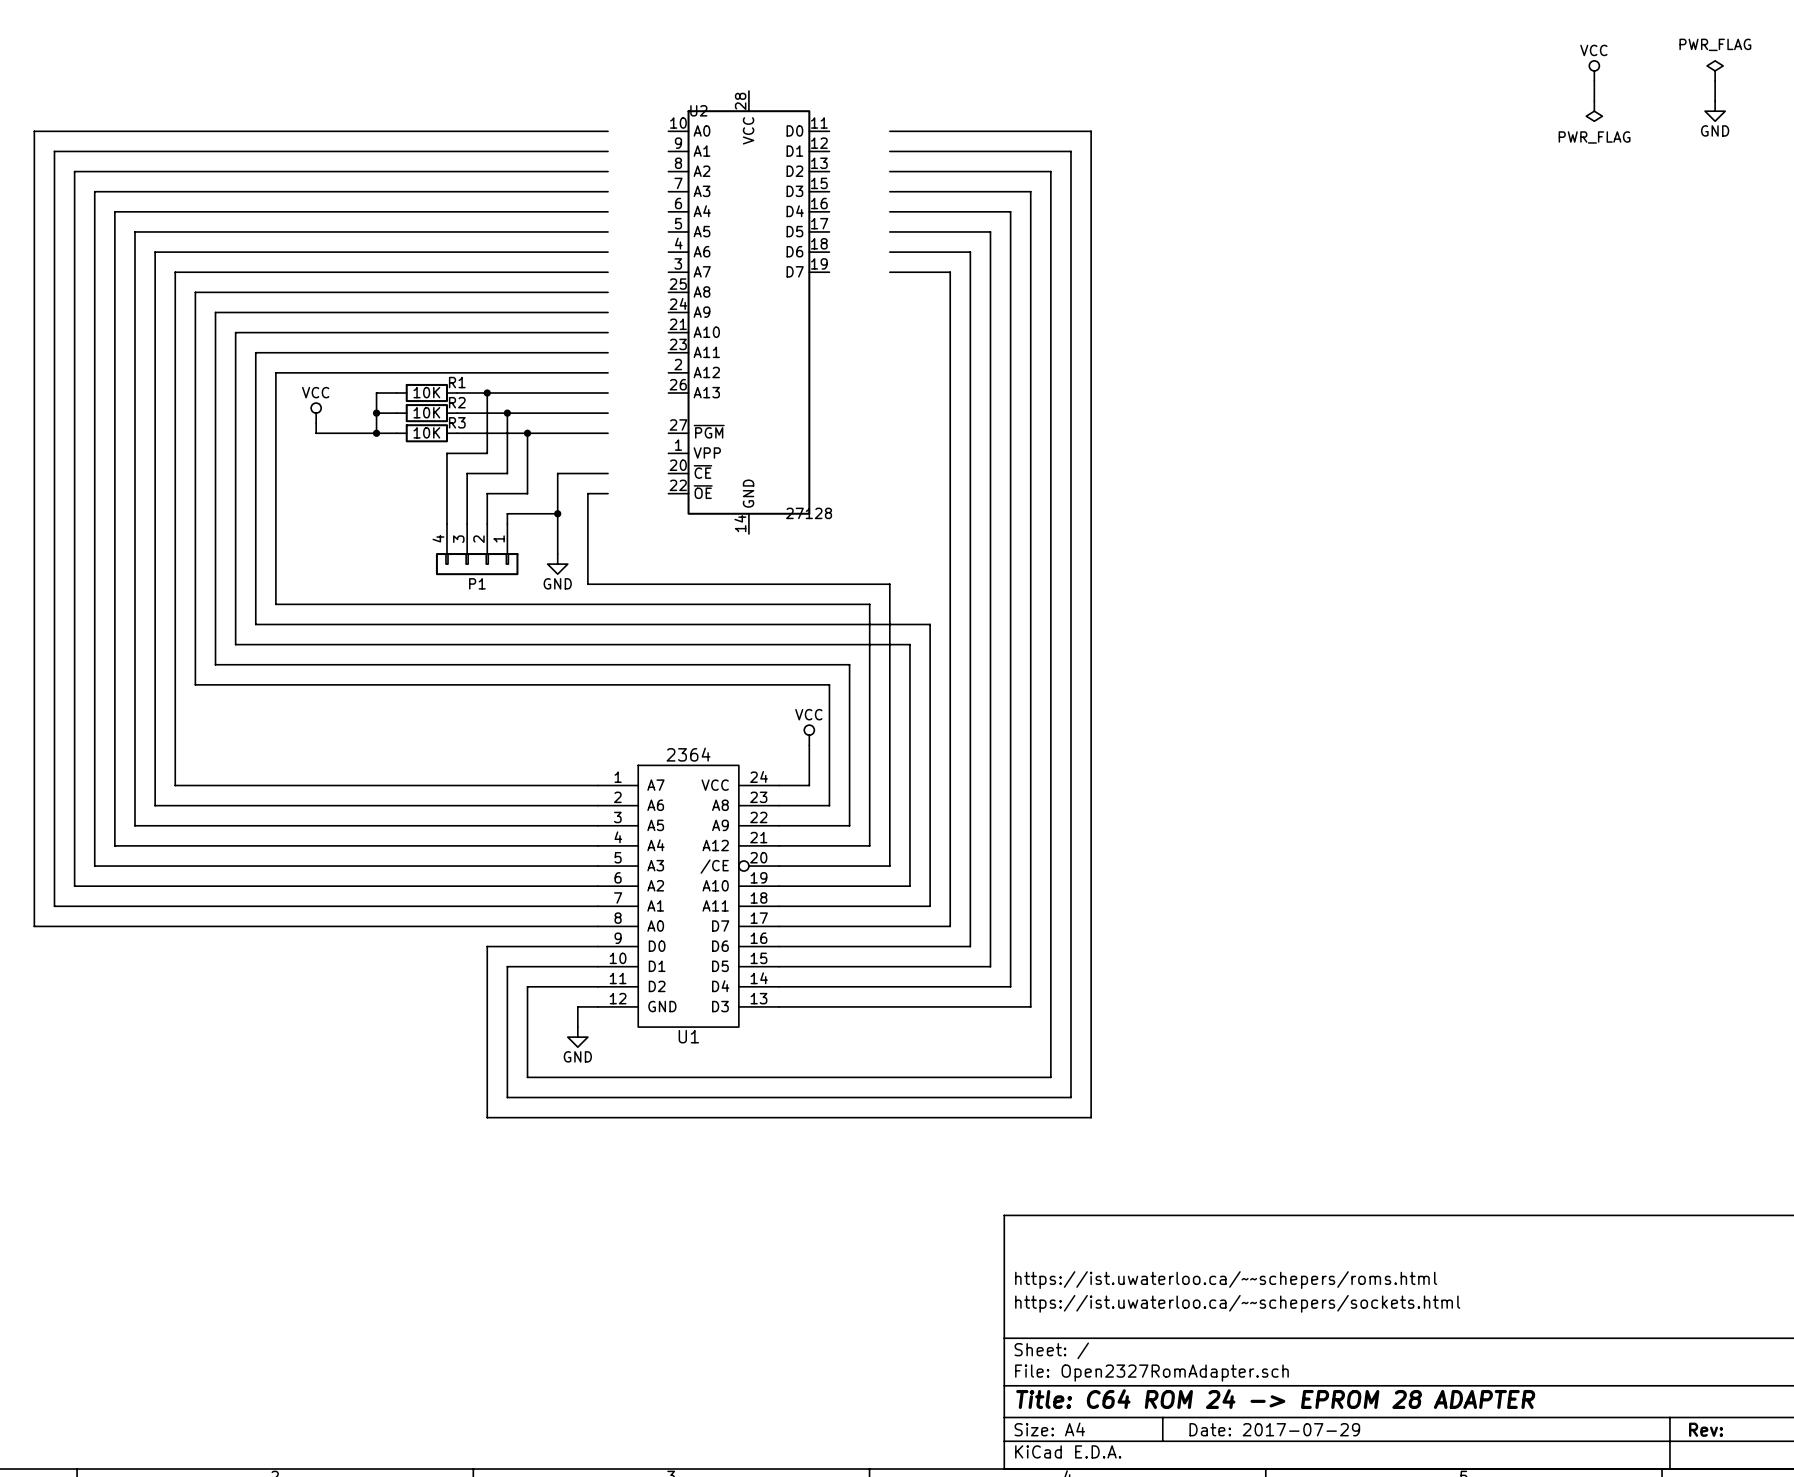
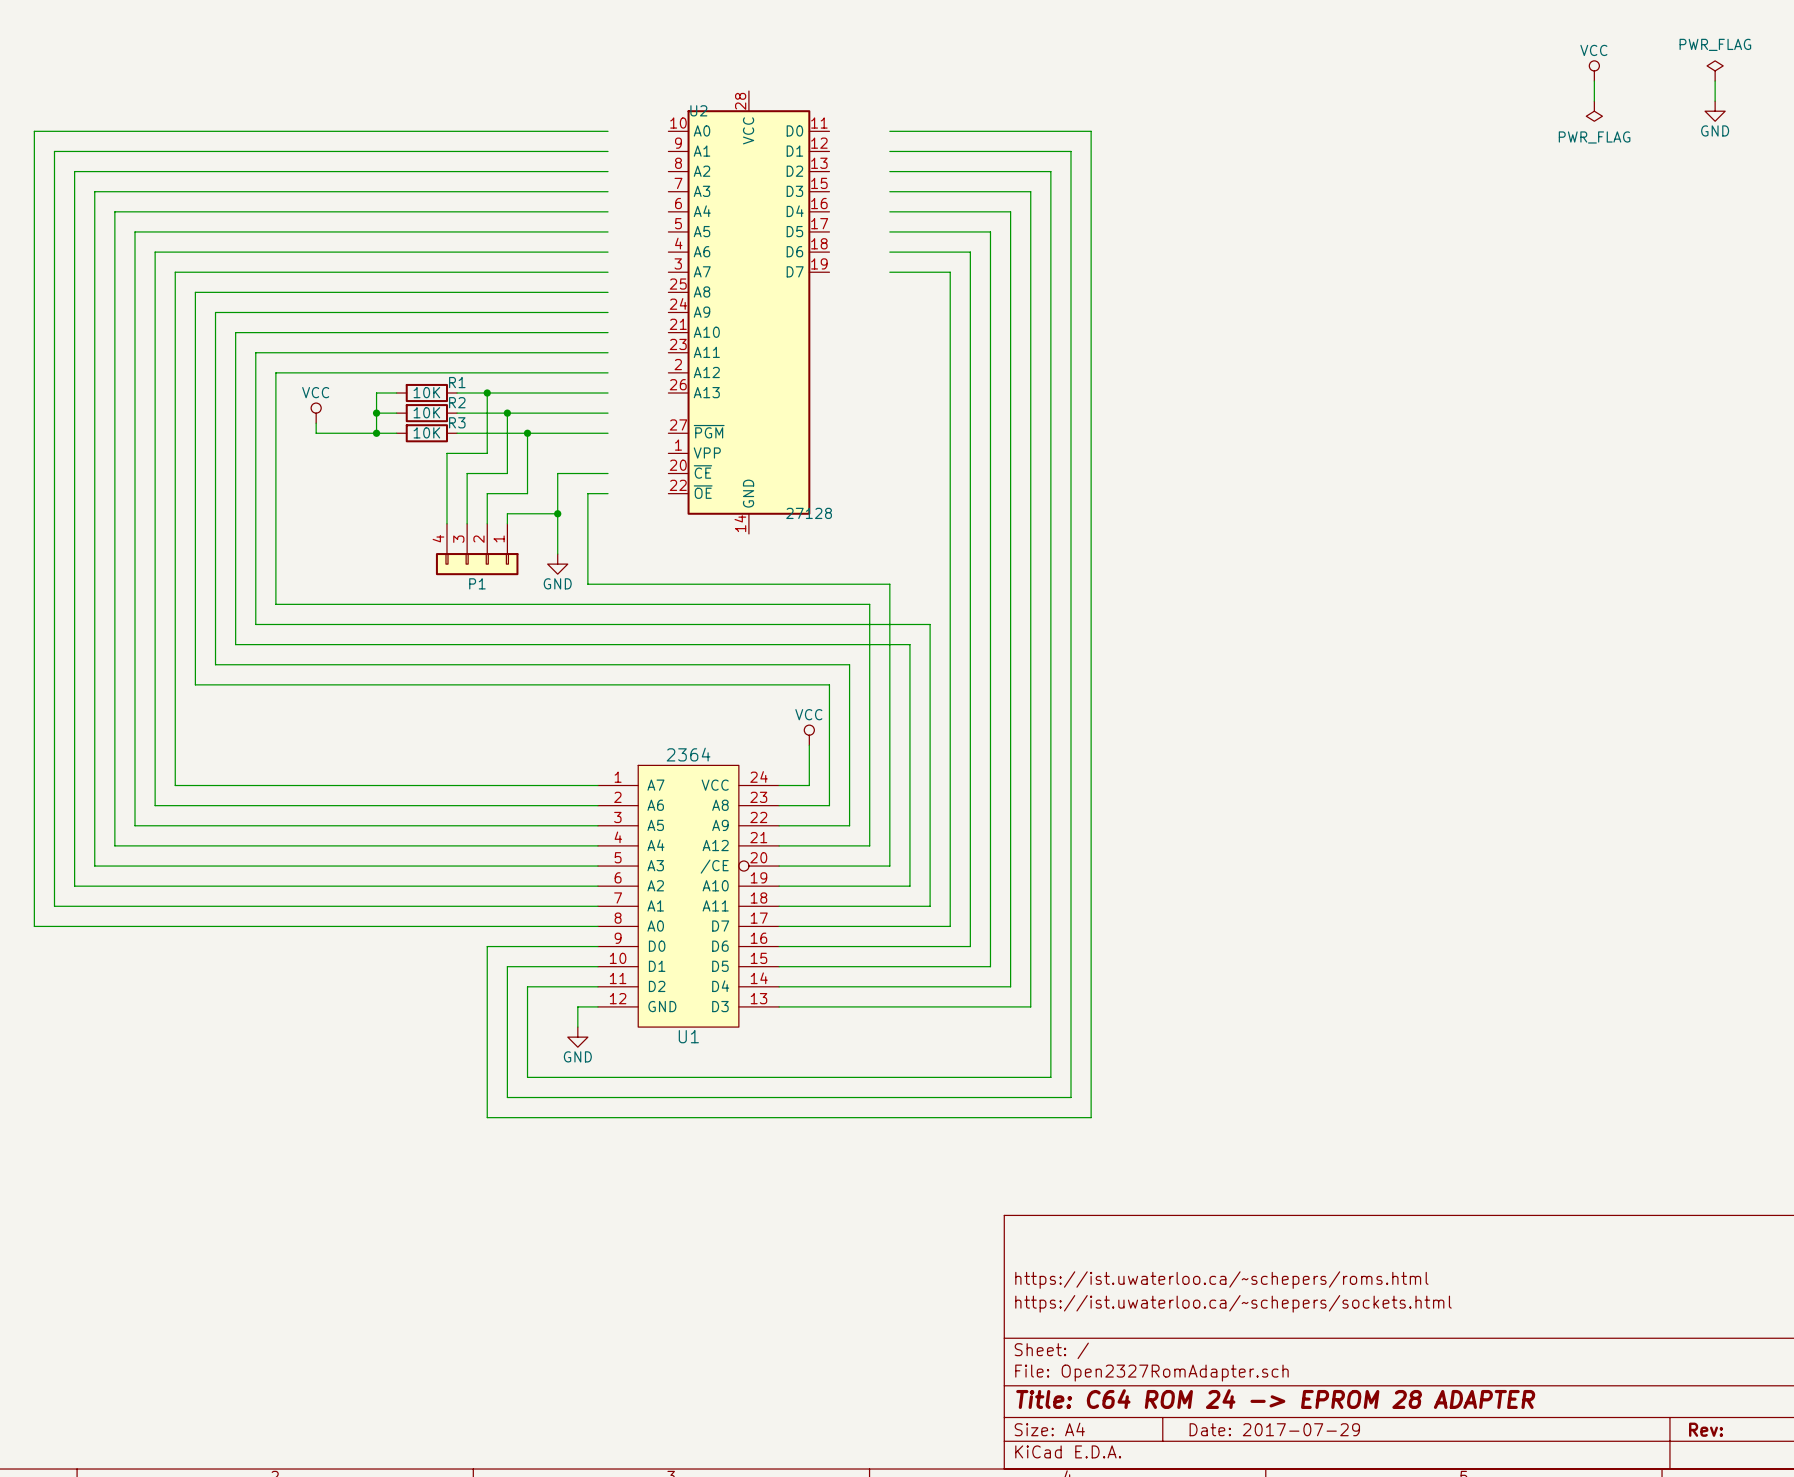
title block: https://ist.uwaterloo.ca/~~schepers/roms.html (1226, 1280) -> https://ist.uwaterloo.ca/~schepers/roms.html (1221, 1280)
title block: https://ist.uwaterloo.ca/~~schepers/sockets.html (1237, 1303) -> https://ist.uwaterloo.ca/~schepers/sockets.html (1233, 1303)

